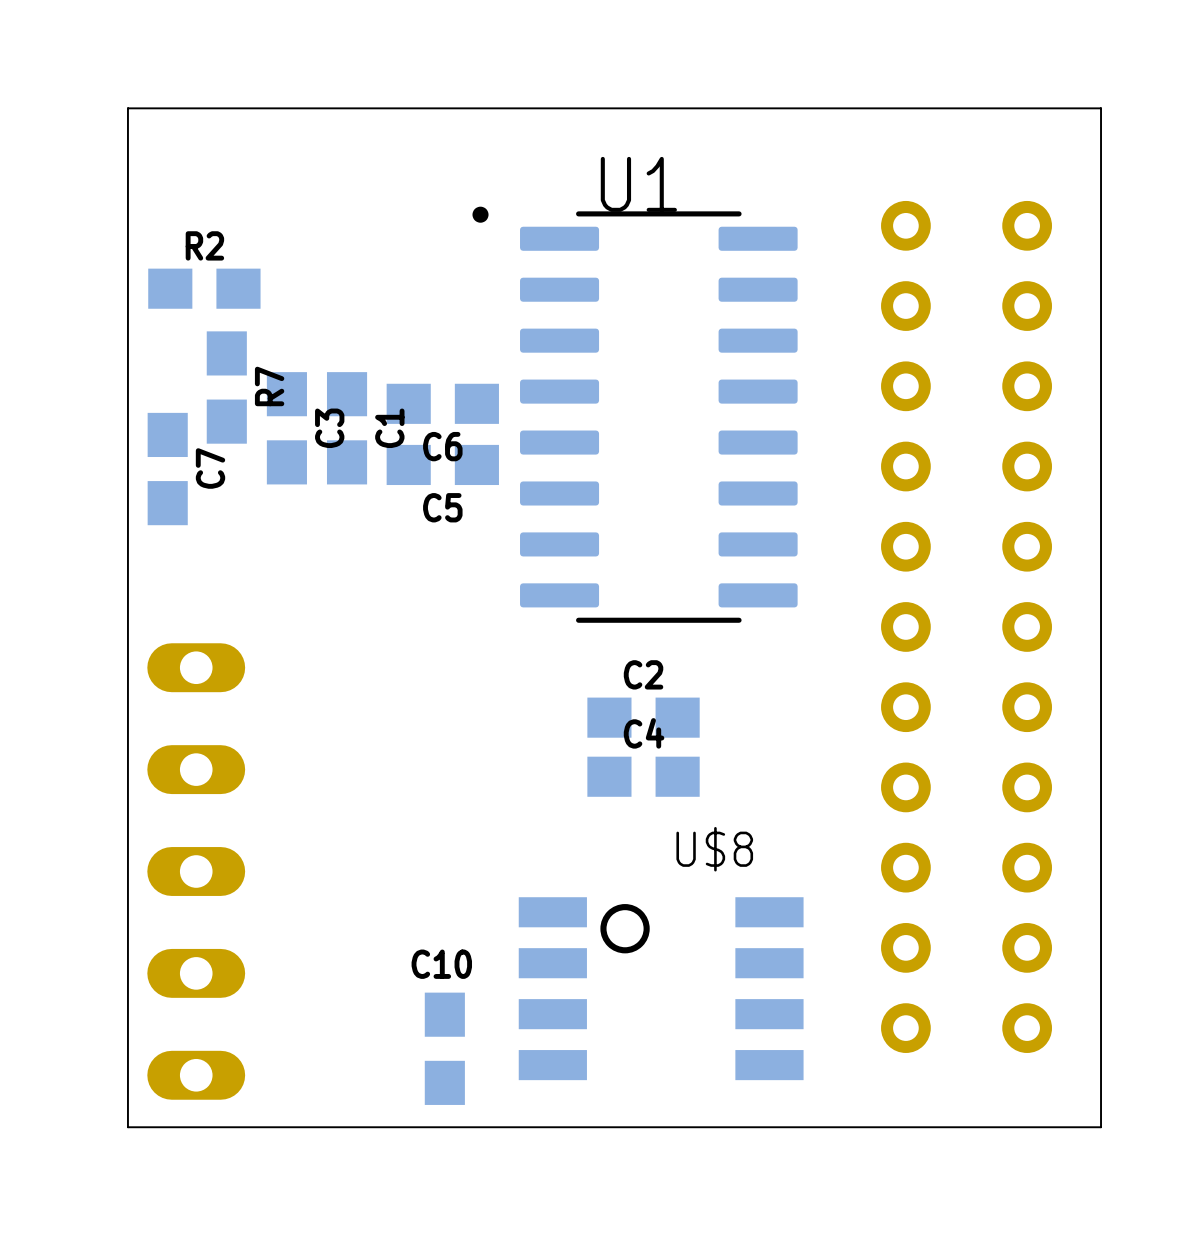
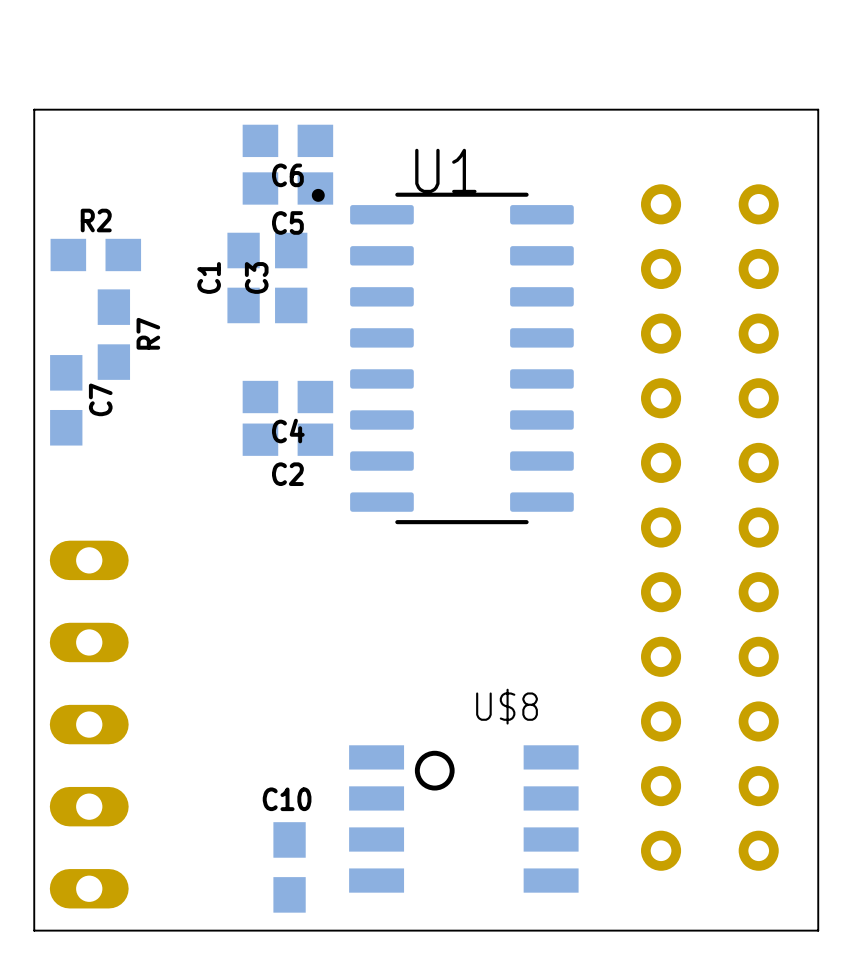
C5: none -> (287, 188)
C6 position: (442, 403) -> (287, 140)
C3 position: (286, 428) -> (291, 277)
C3 name position: C3 (329, 428) -> C3 (256, 277)
C1 position: (347, 428) -> (243, 277)
C1 name position: C1 (389, 428) -> C1 (209, 277)
C5 name: C5 (442, 507) -> C4 (288, 431)
C2 name position: C2 (643, 674) -> C2 (287, 474)
C2 position: (643, 717) -> (287, 439)
C4: (643, 776) -> none

